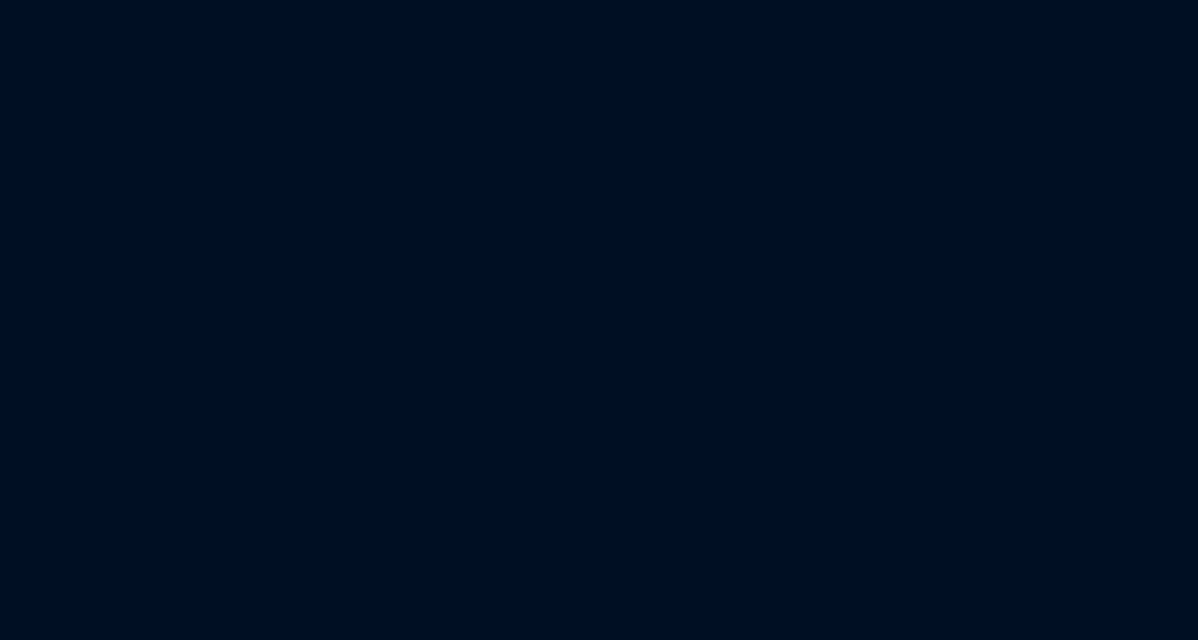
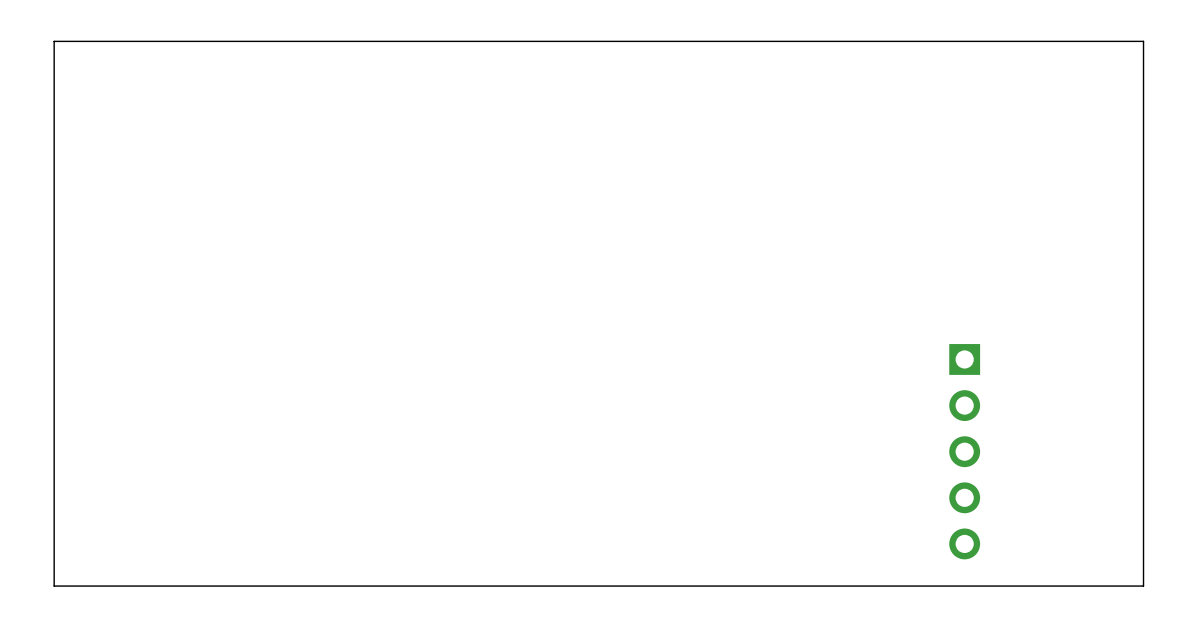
board edge: none -> (1143, 41) (54, 41) (54, 586) (1143, 586) (1143, 41)
part: none -> (964, 451)

